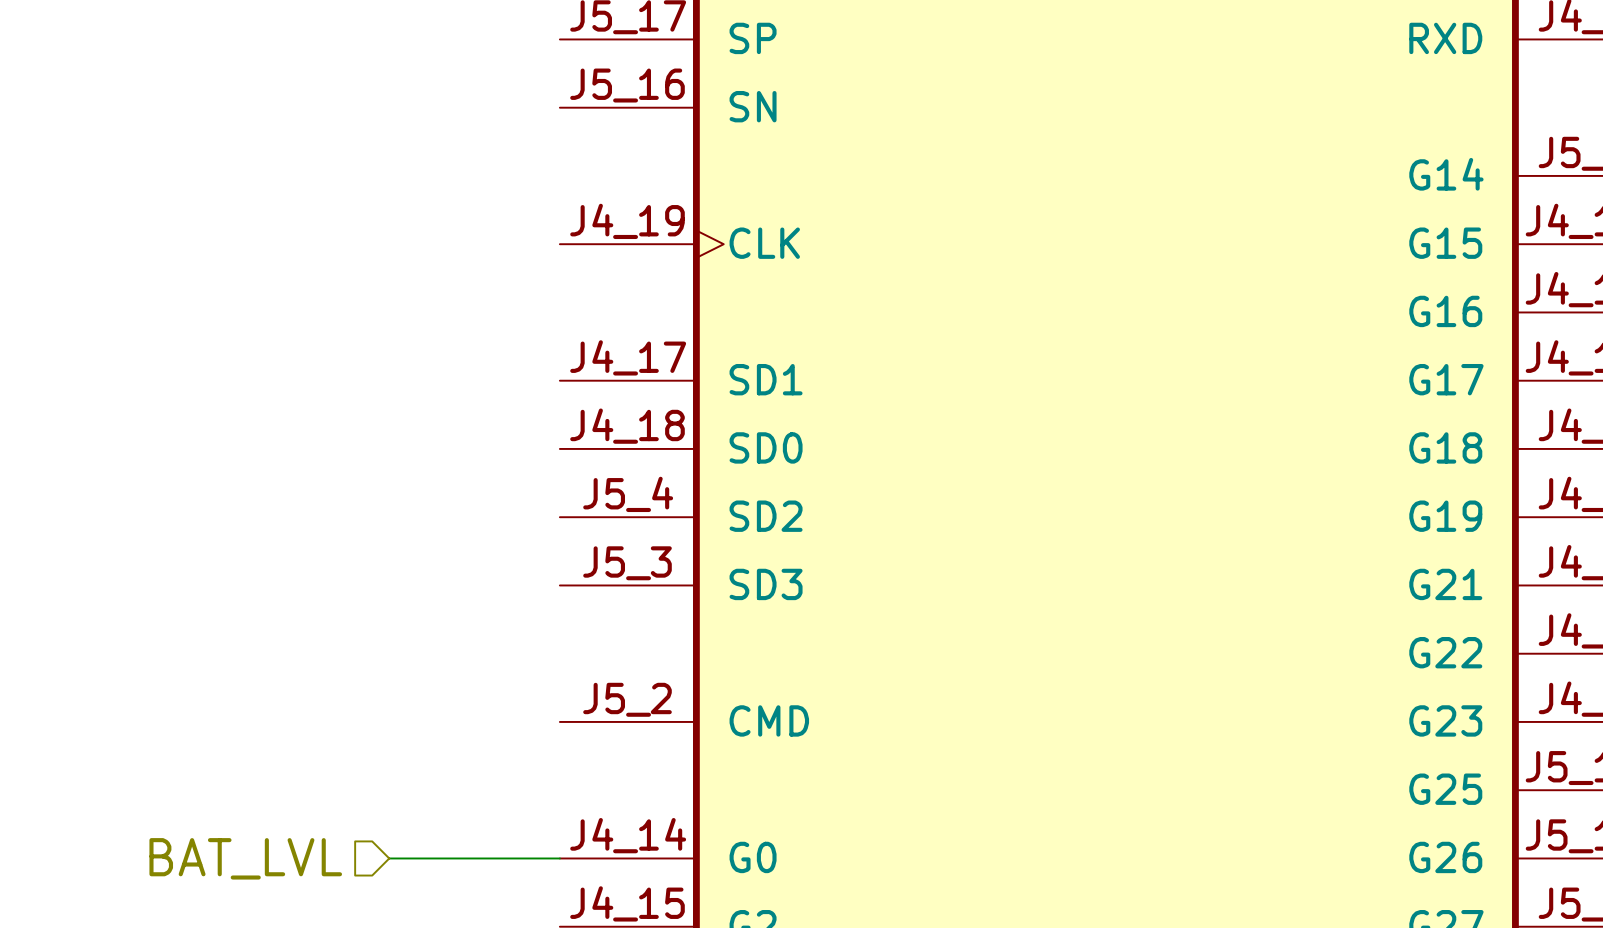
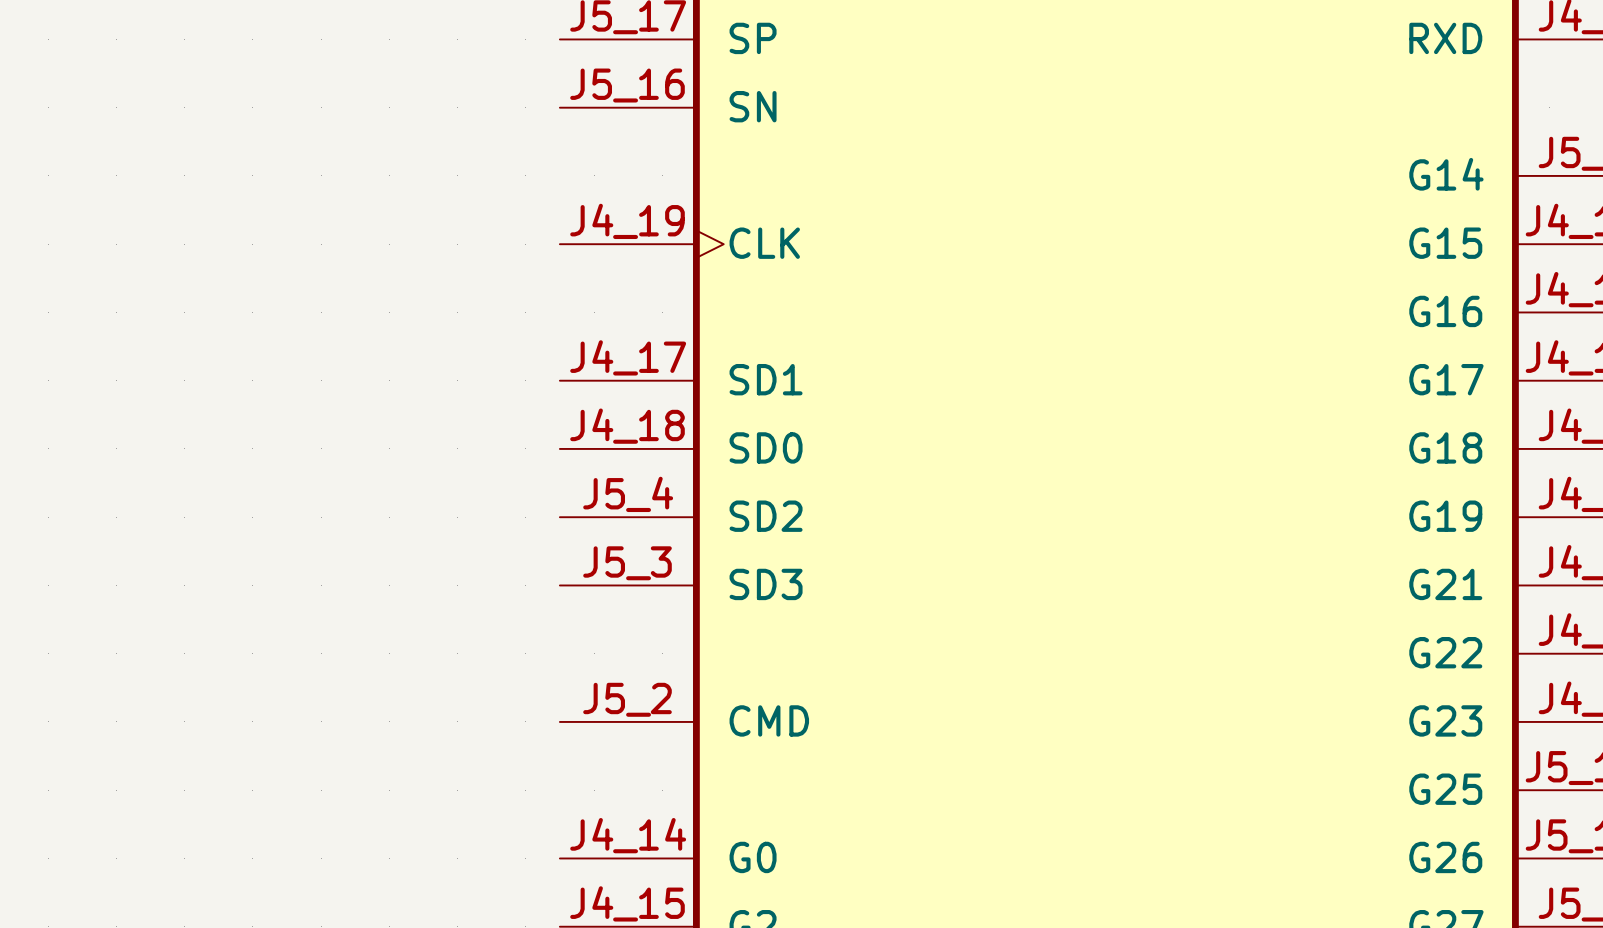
hierarchical label: BAT_LVL (245, 858) -> none
wire: (389, 858) (559, 858) -> none

